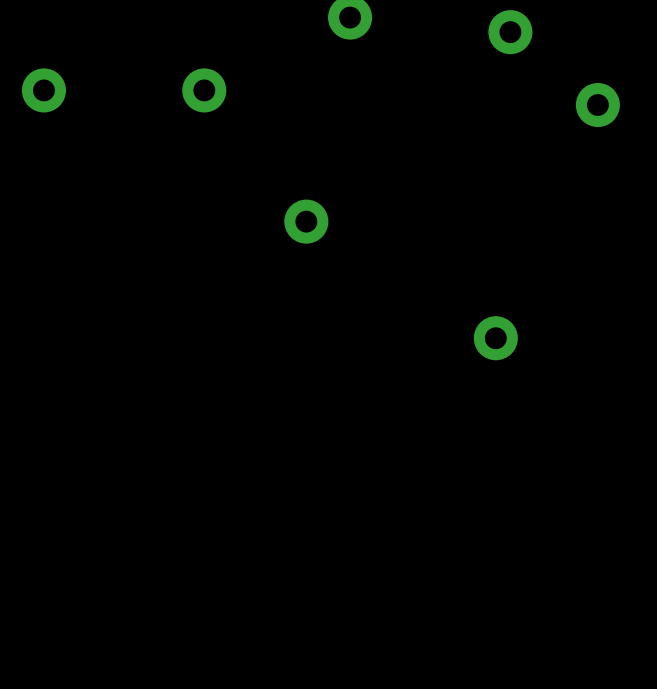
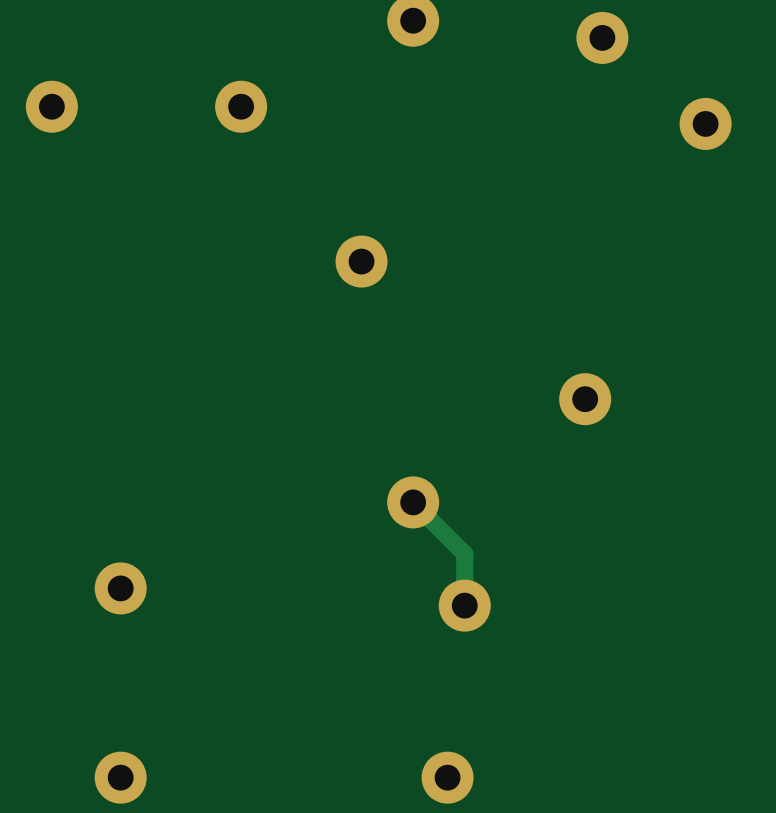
track: none -> (413, 502) (464, 554) (464, 605)
via: none -> (413, 502)
via: none -> (120, 588)
via: none -> (464, 605)
via: none -> (120, 777)
via: none -> (447, 777)

